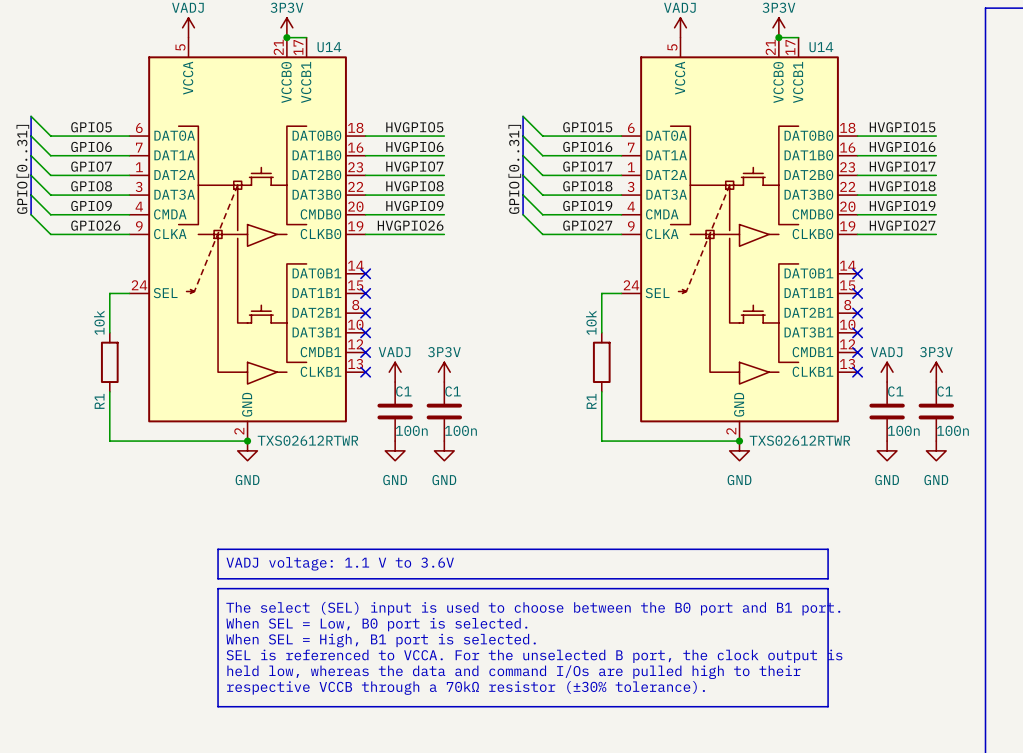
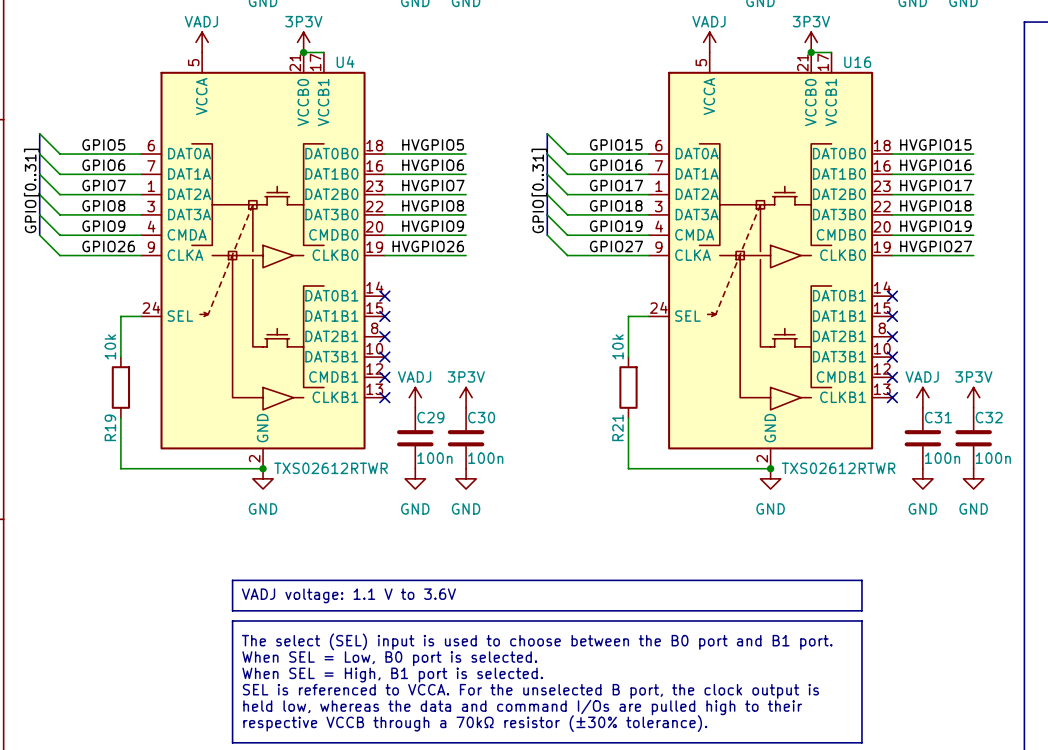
U14 name: U14 (329, 47) -> U4 (345, 62)
U14 name: U14 (821, 47) -> U16 (857, 62)
C1 name: C1 (403, 391) -> C29 (430, 417)
C1 name: C1 (452, 391) -> C30 (481, 417)
C1 name: C1 (895, 391) -> C31 (938, 417)
C1 name: C1 (944, 391) -> C32 (989, 417)
R1 name: R1 (99, 401) -> R19 (110, 427)
R1 name: R1 (591, 401) -> R21 (617, 427)

